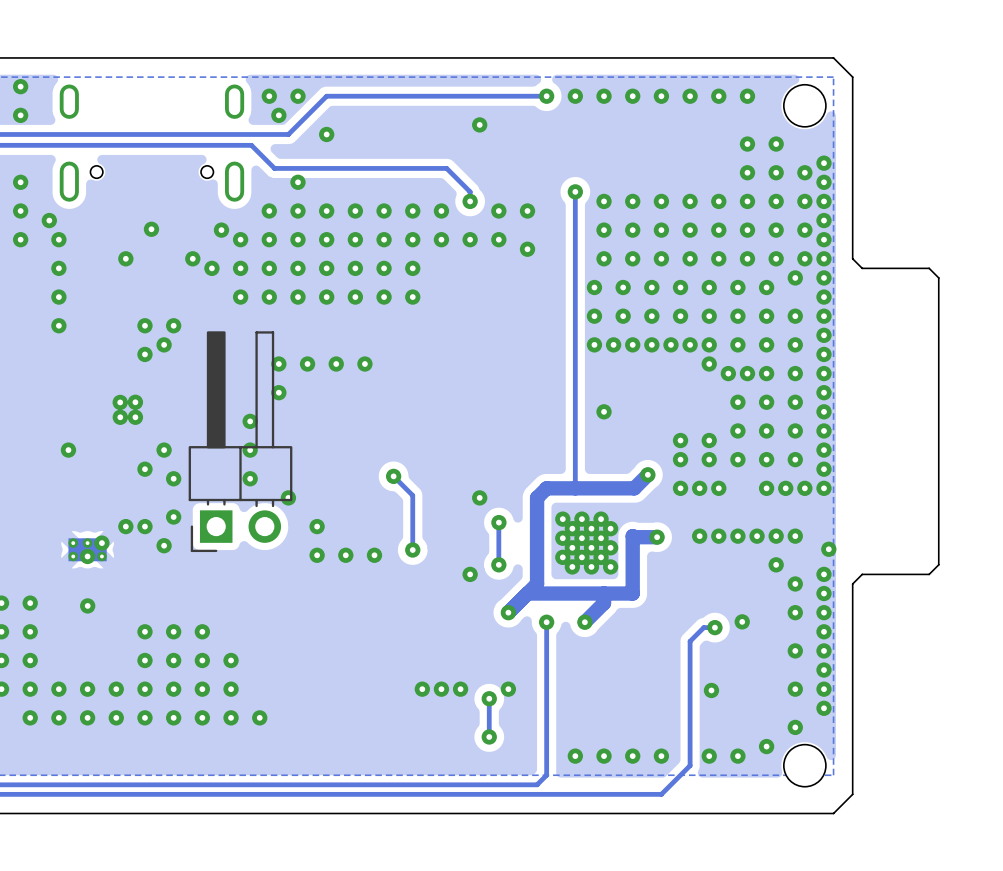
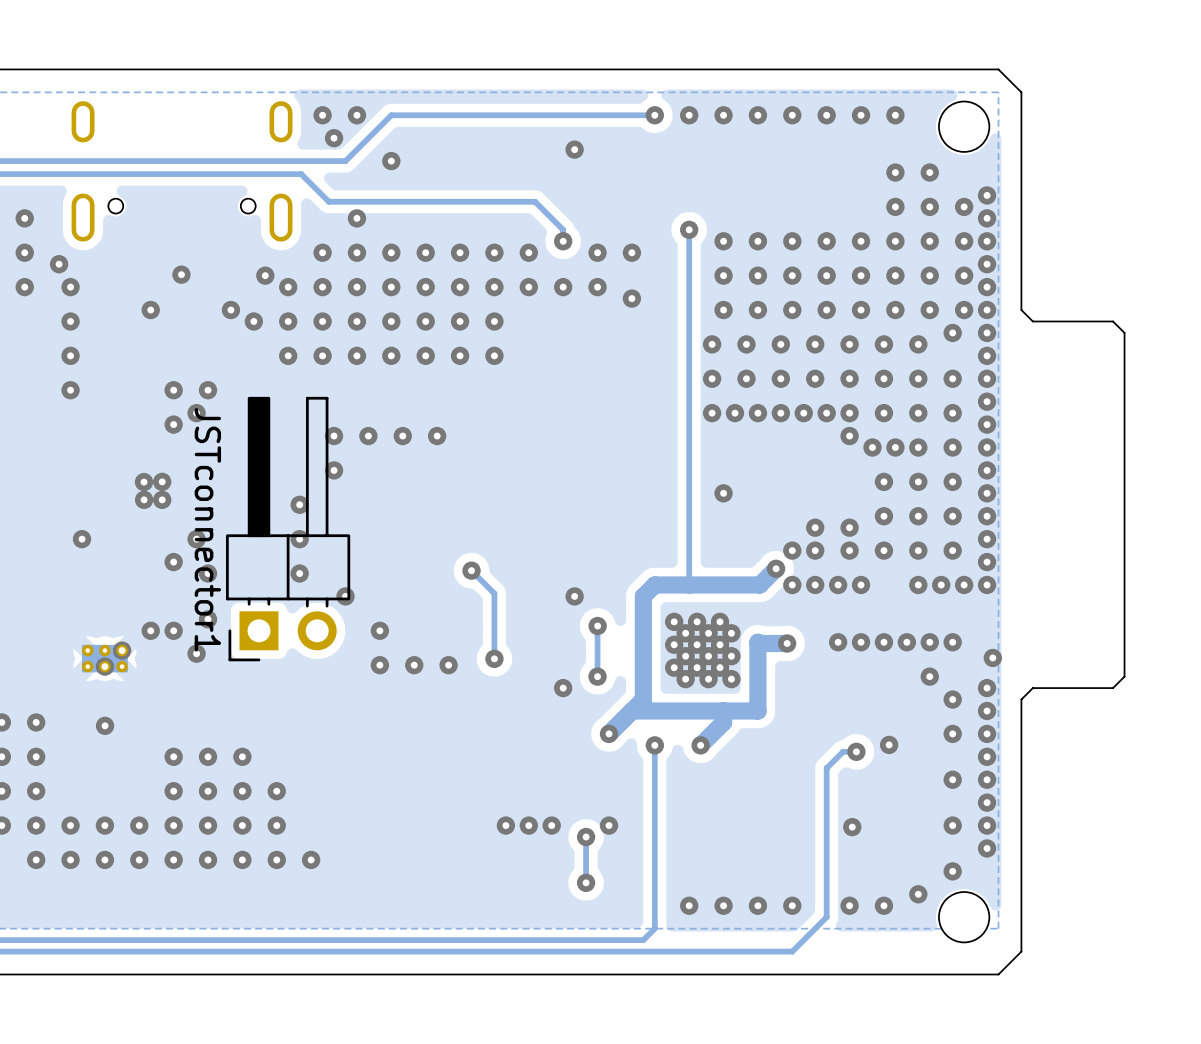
via: (20, 86) -> none
via: (20, 115) -> none
JSTconnector1 name: none -> JSTconnector1 (207, 529)
via: none -> (792, 550)
via: none -> (792, 584)

